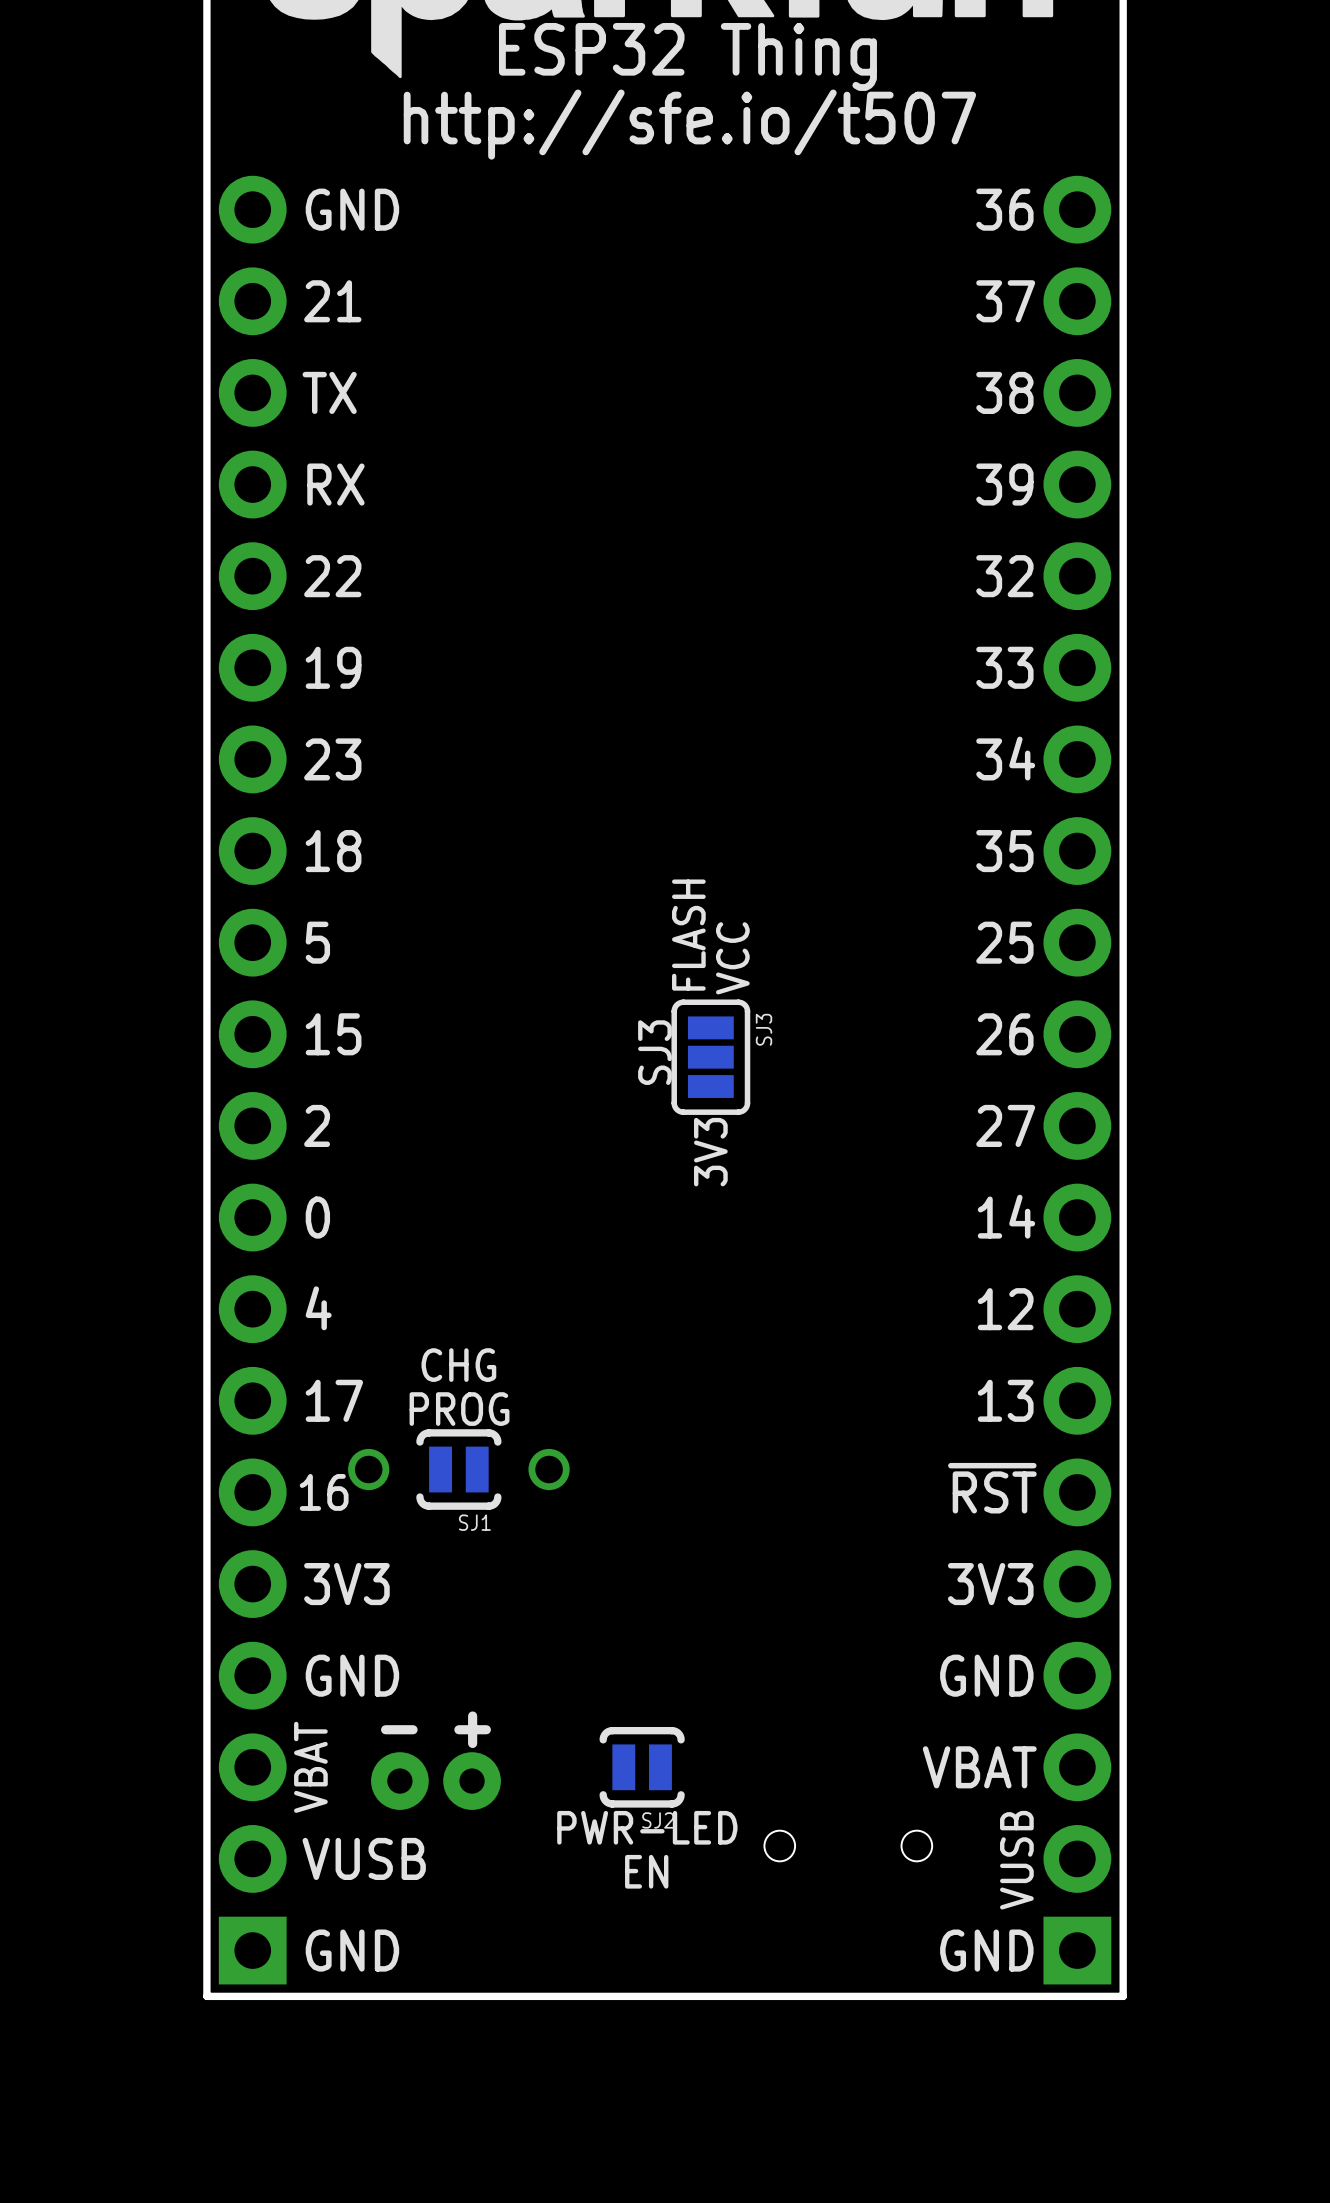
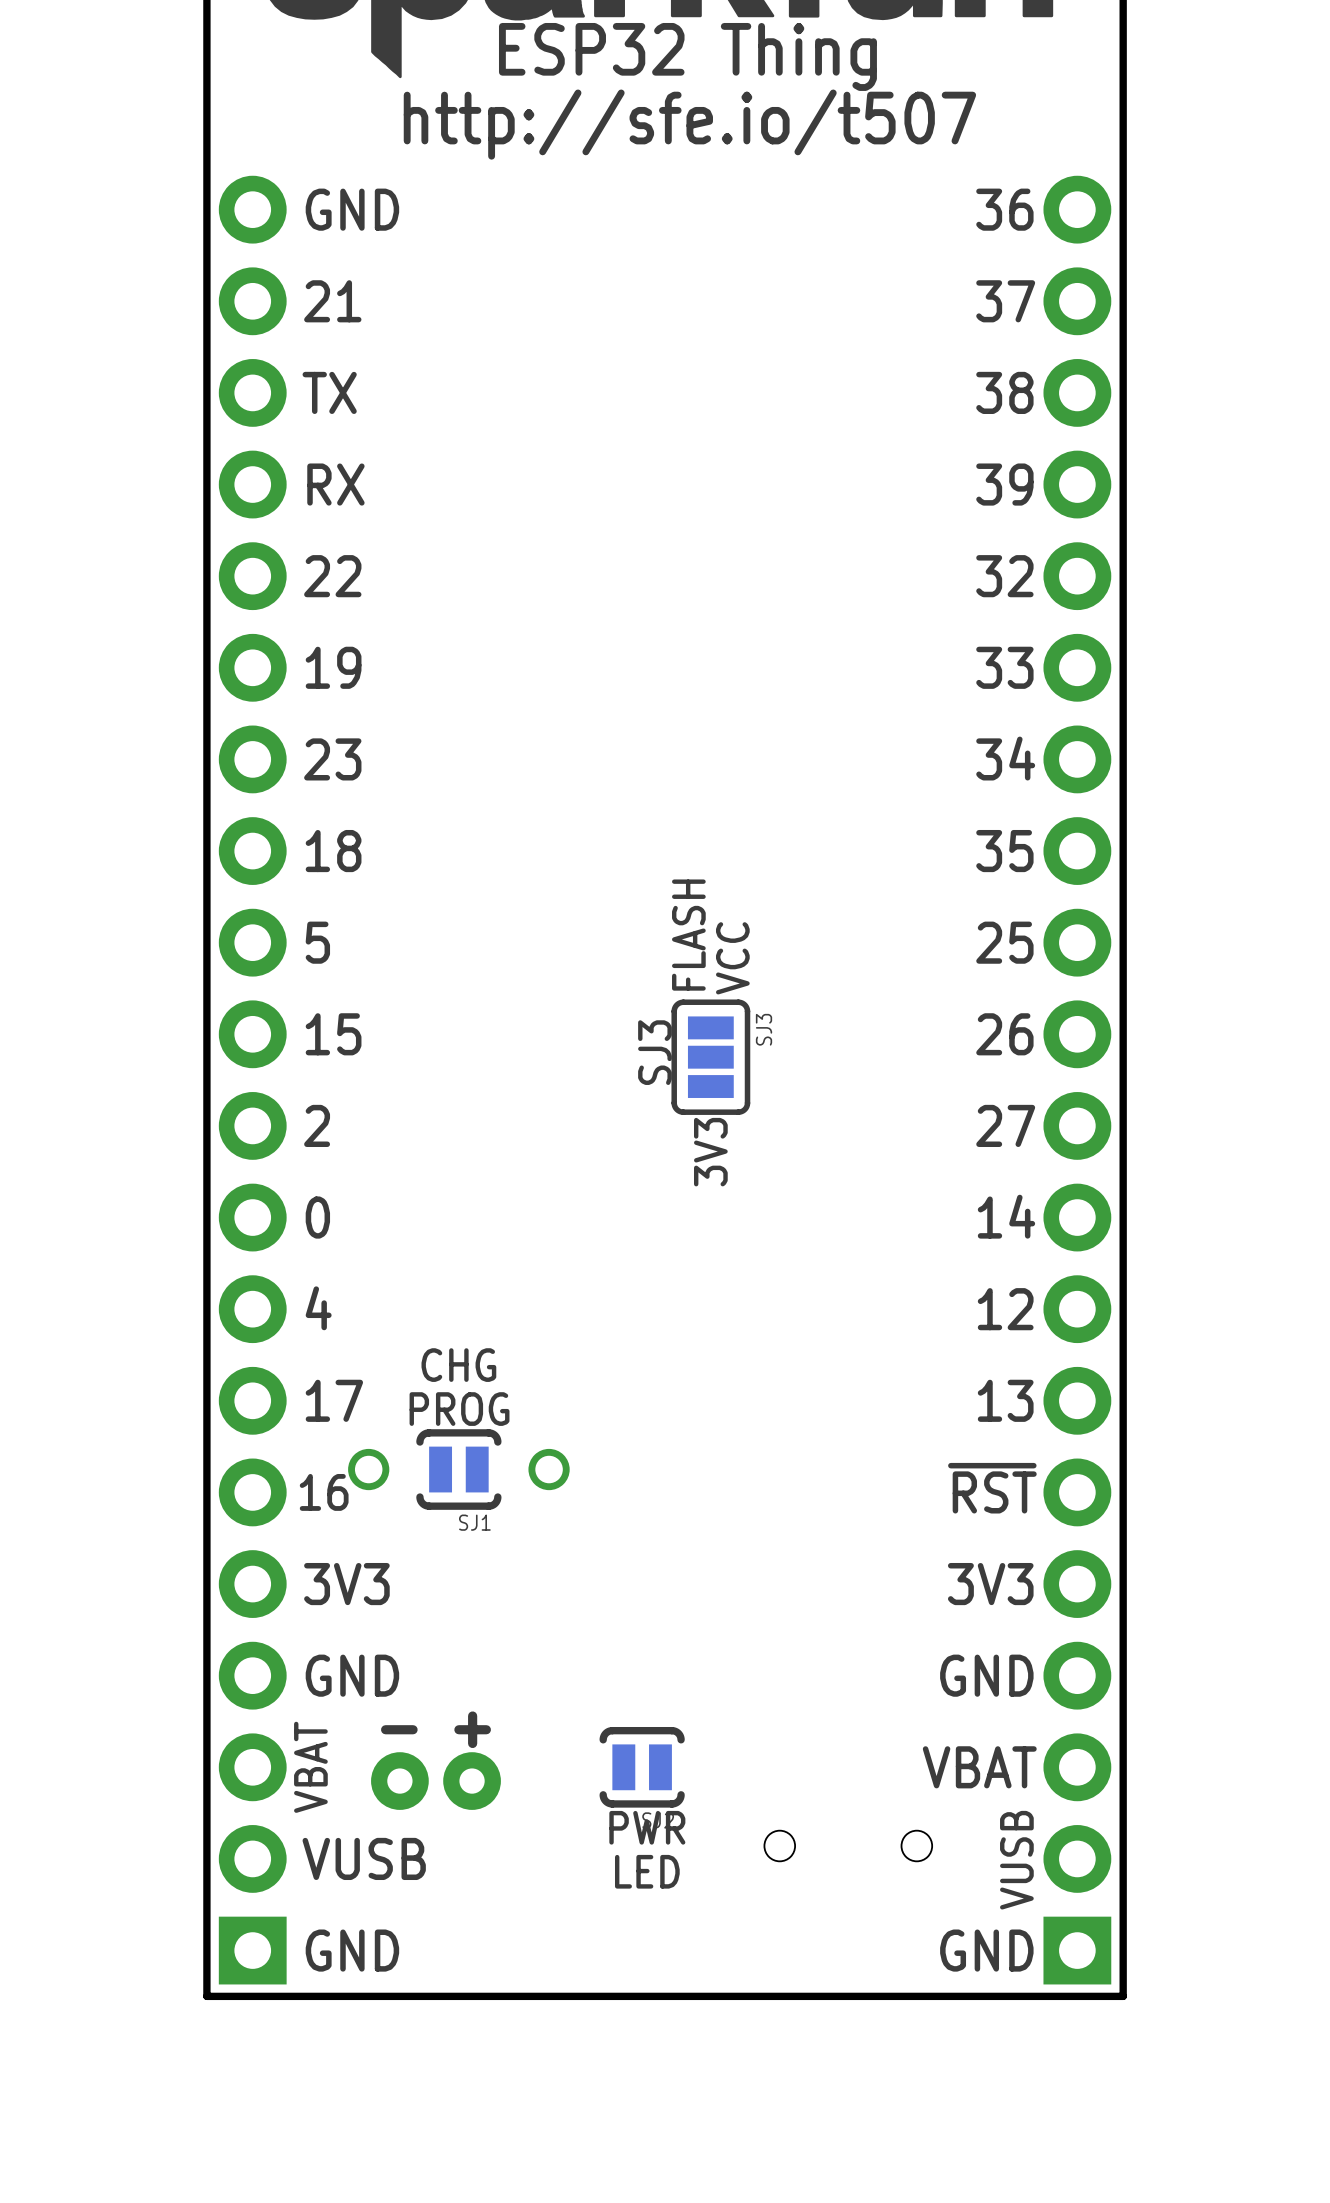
text: PWR-LED (647, 1827) -> PWR (647, 1827)
text: EN (646, 1871) -> LED (647, 1871)

